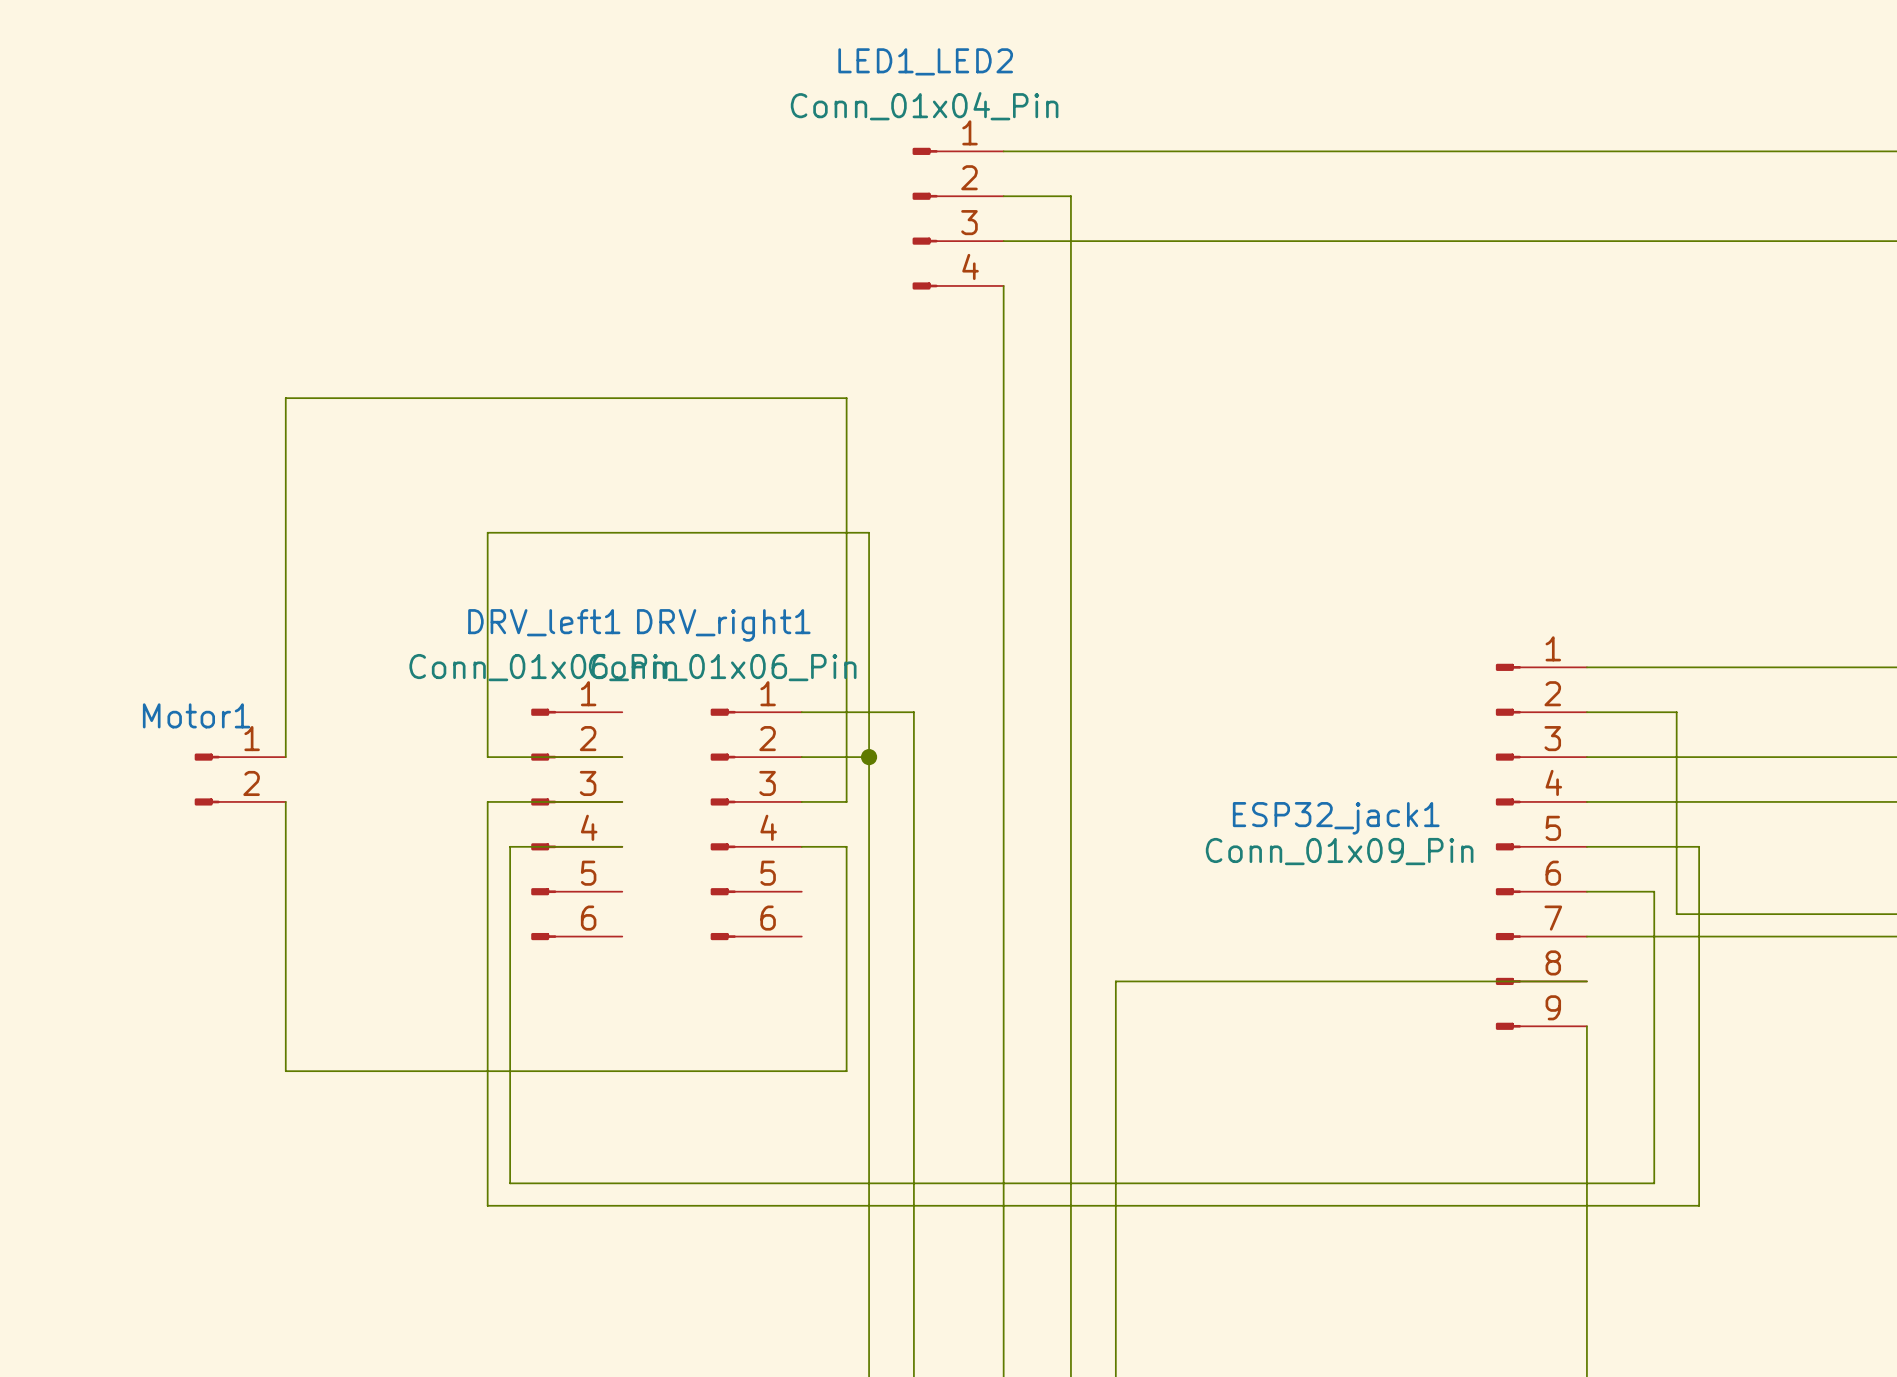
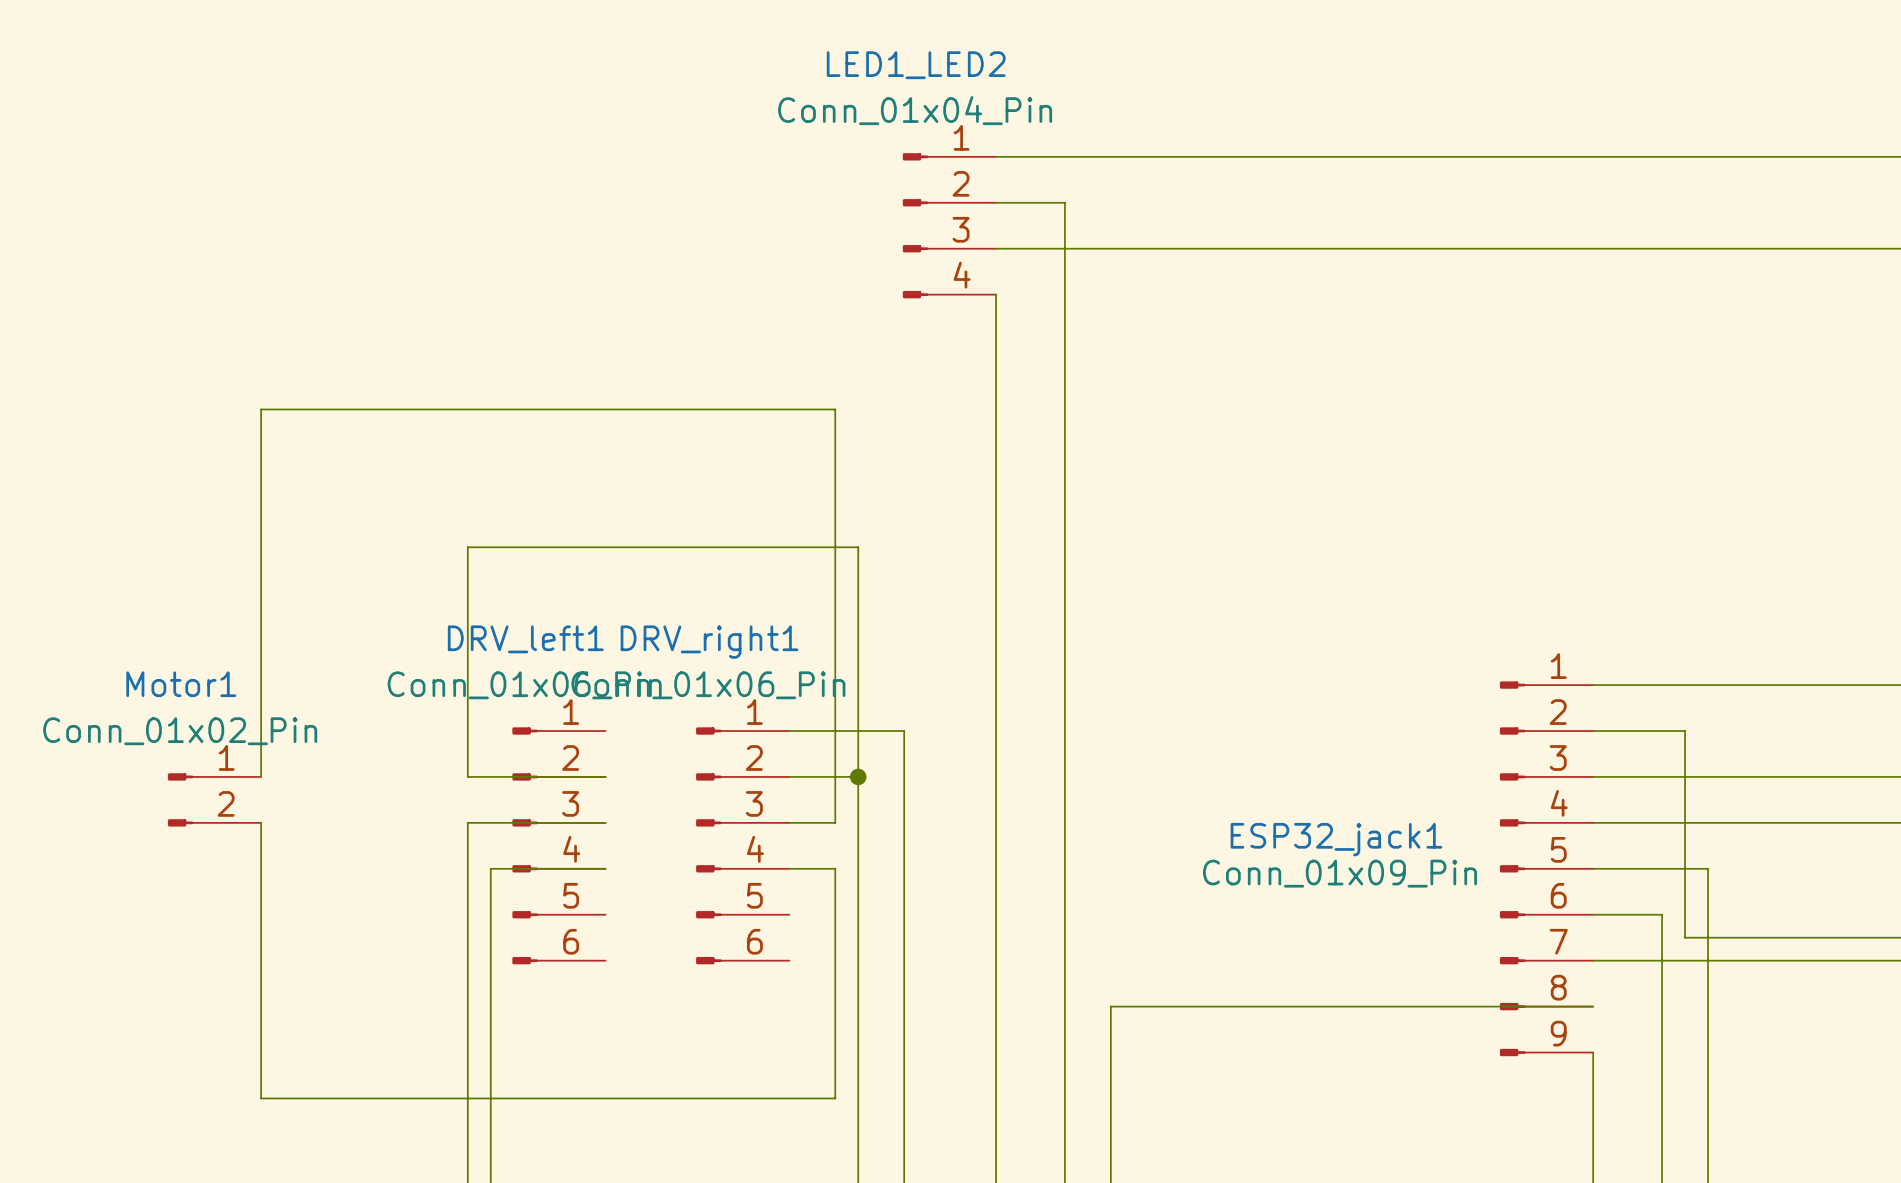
Motor1 value: none -> Conn_01x02_Pin (180, 731)
Motor1 name position: Motor1 (196, 715) -> Motor1 (181, 684)

